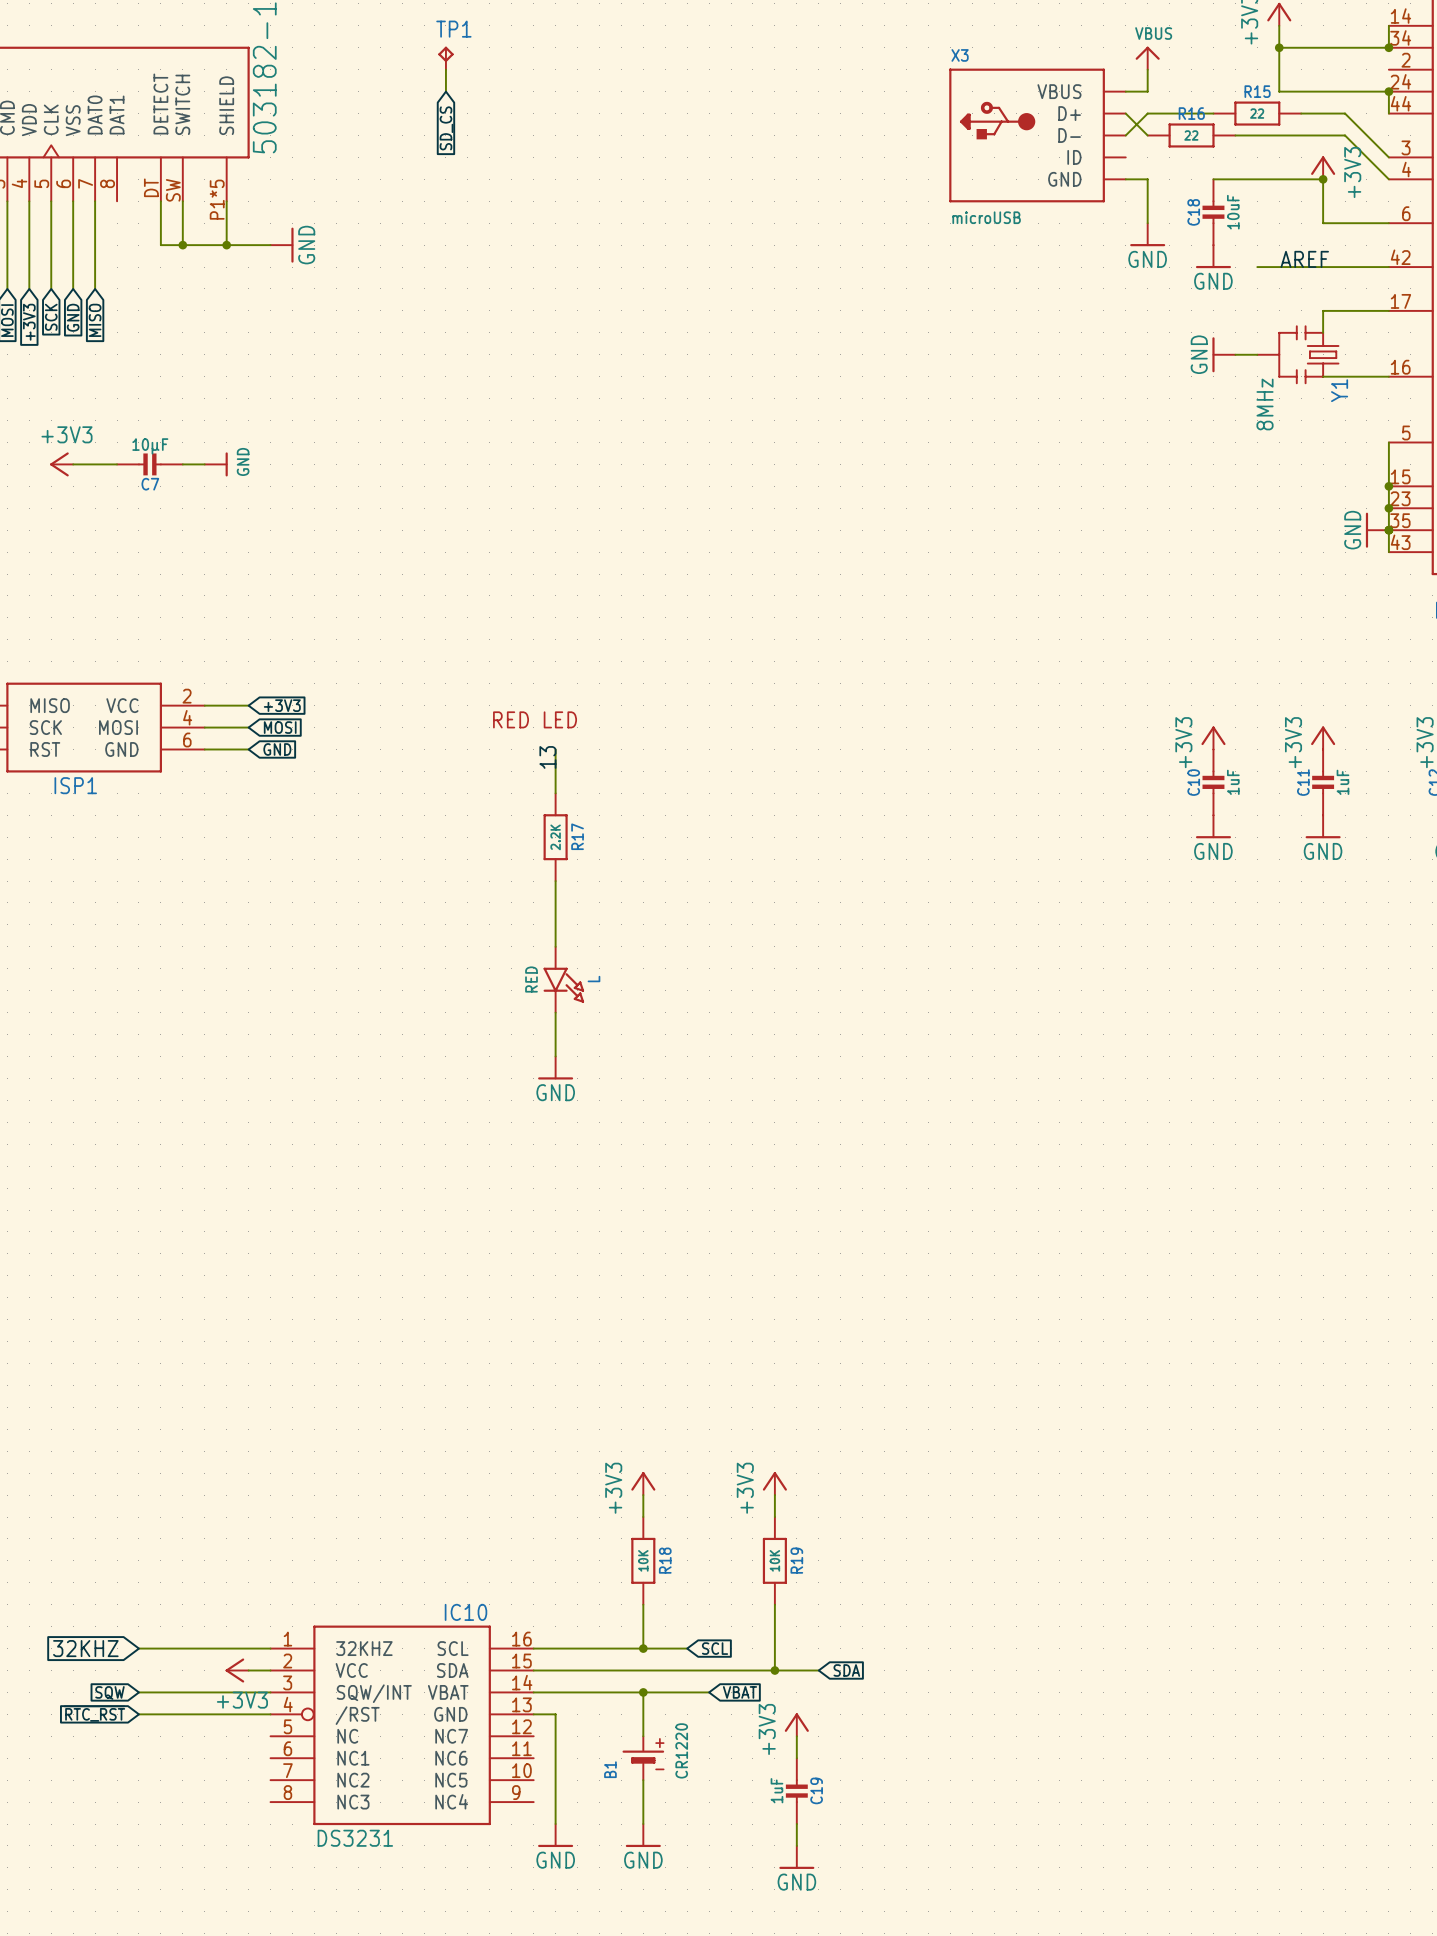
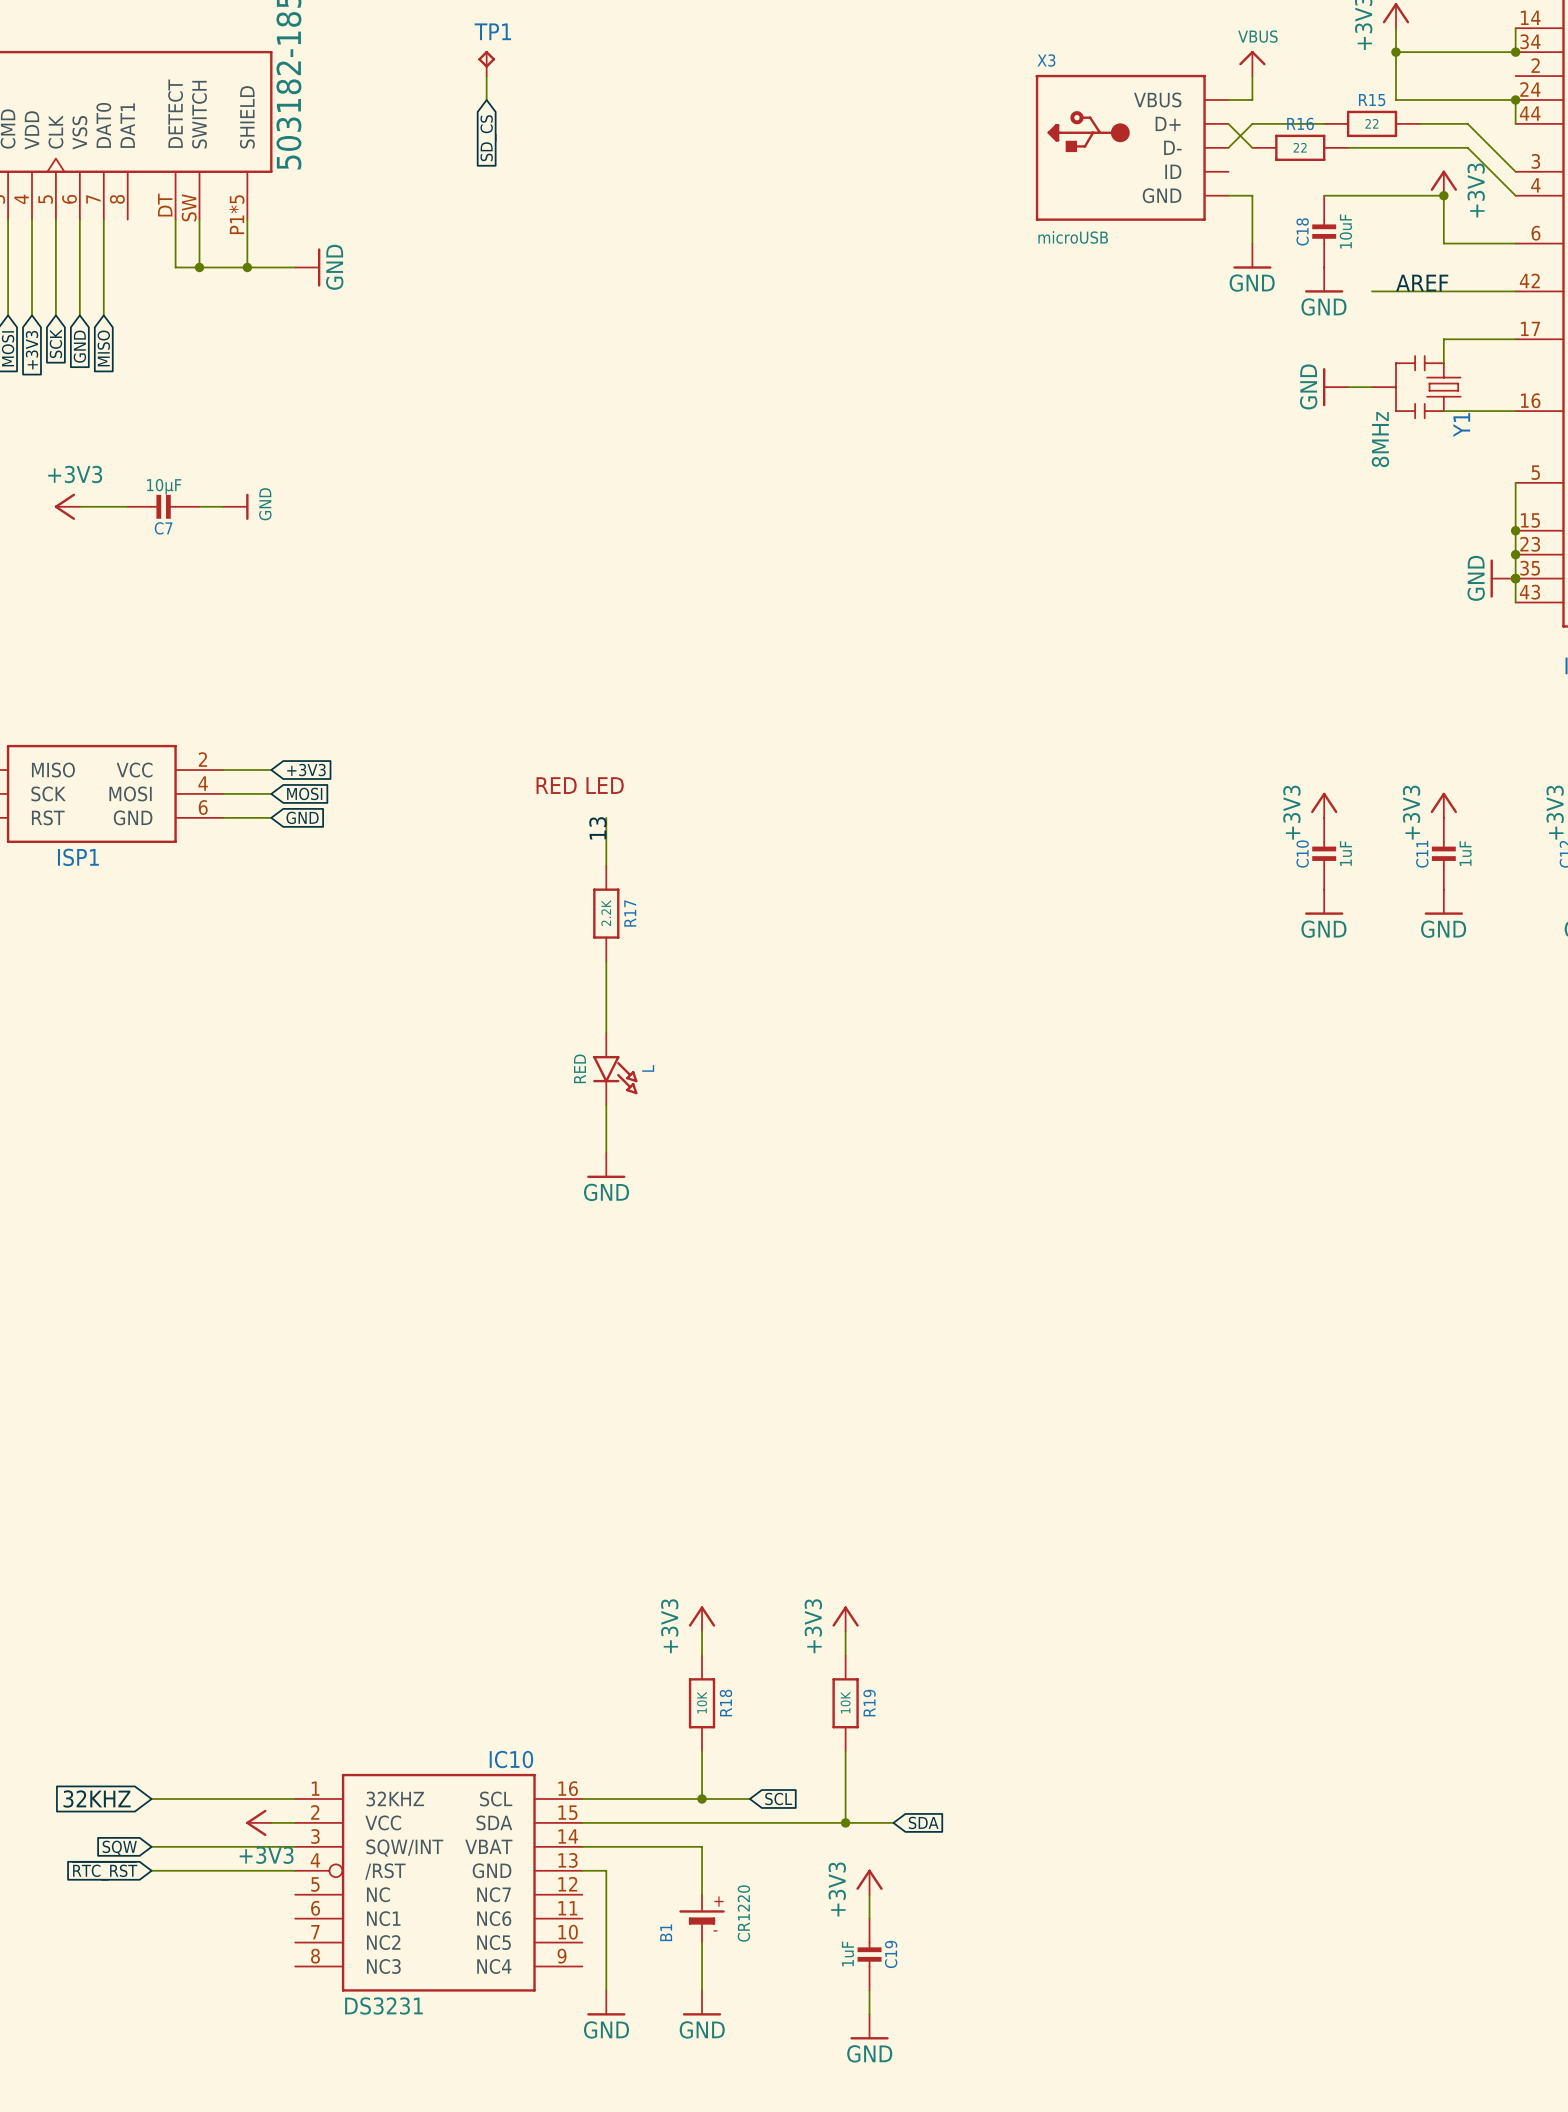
wire: (643, 1692) (709, 1692) -> none
junction: (643, 1692) -> none
global label: VBAT (740, 1692) -> none

